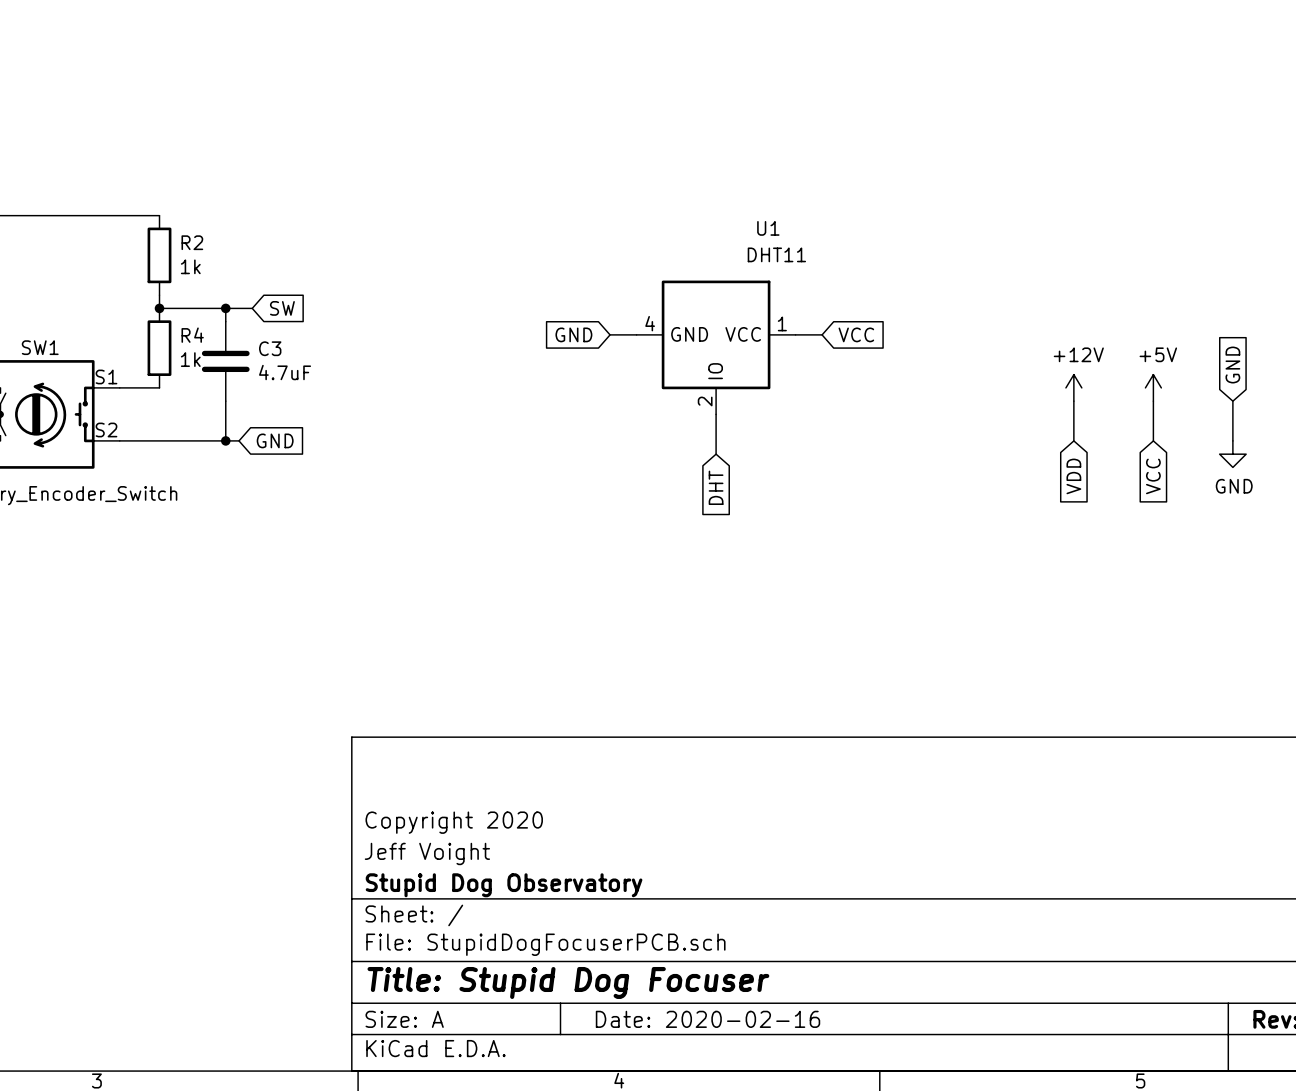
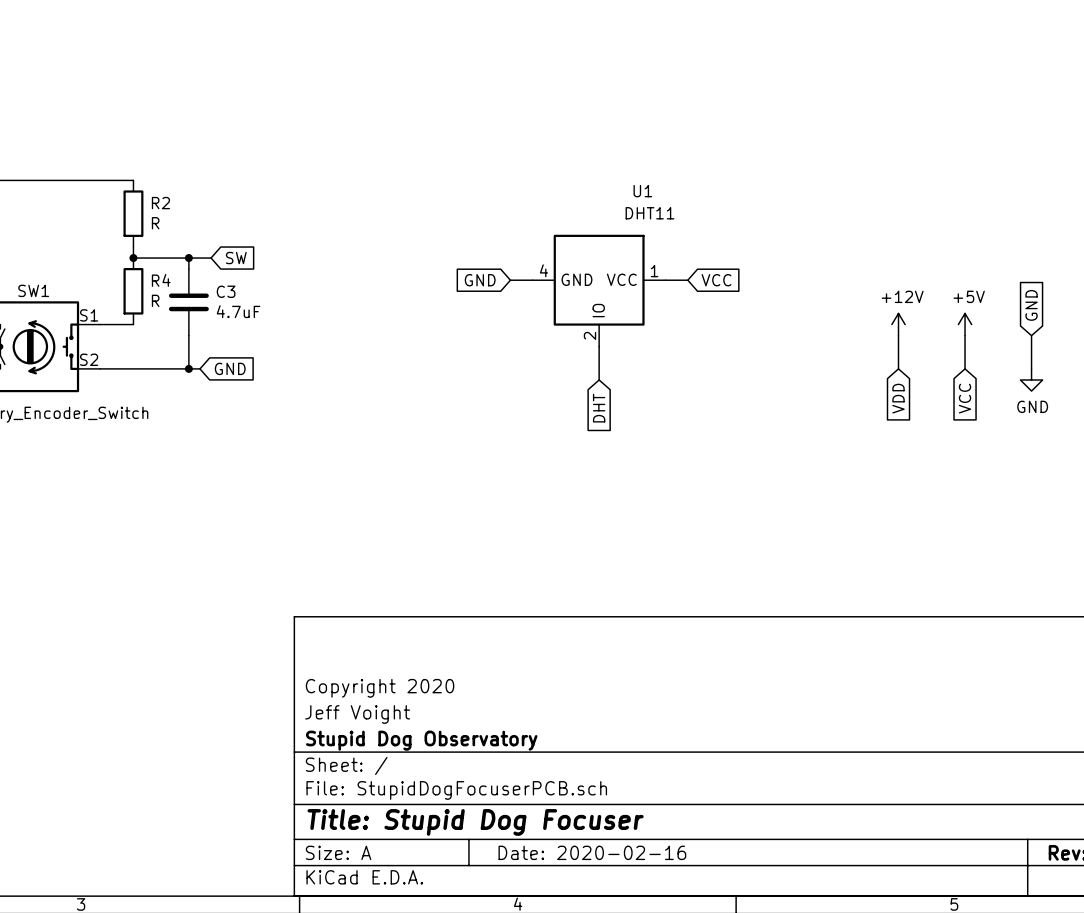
R2 value: 1k (190, 266) -> R (155, 223)
R4 value: 1k (190, 359) -> R (155, 300)

